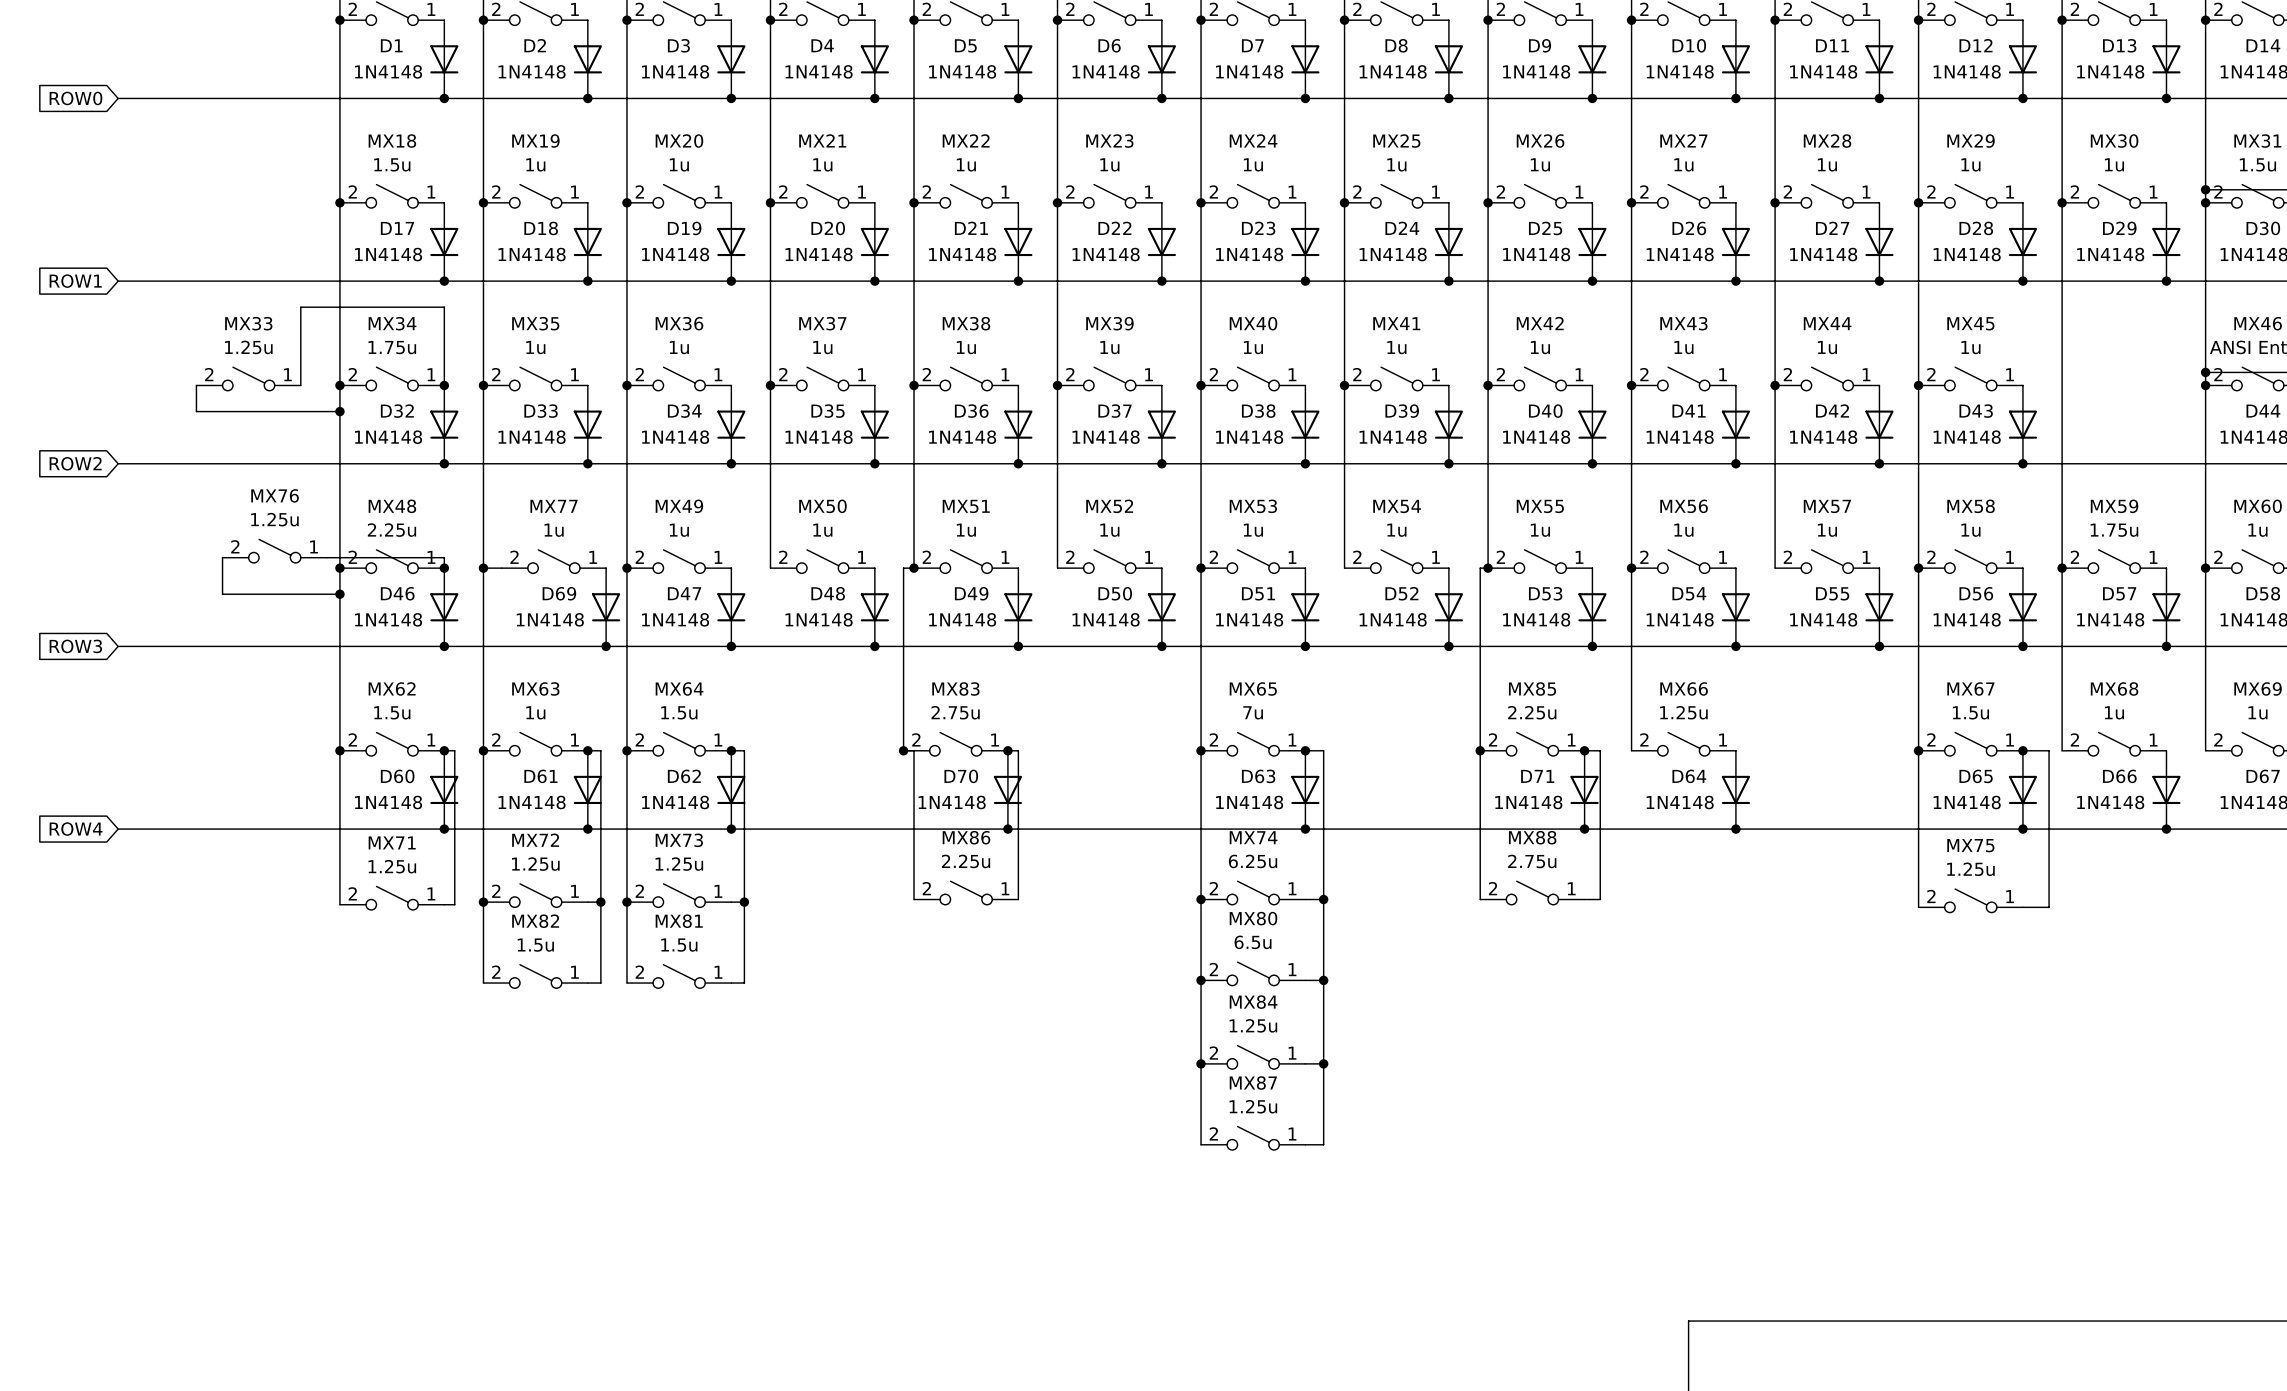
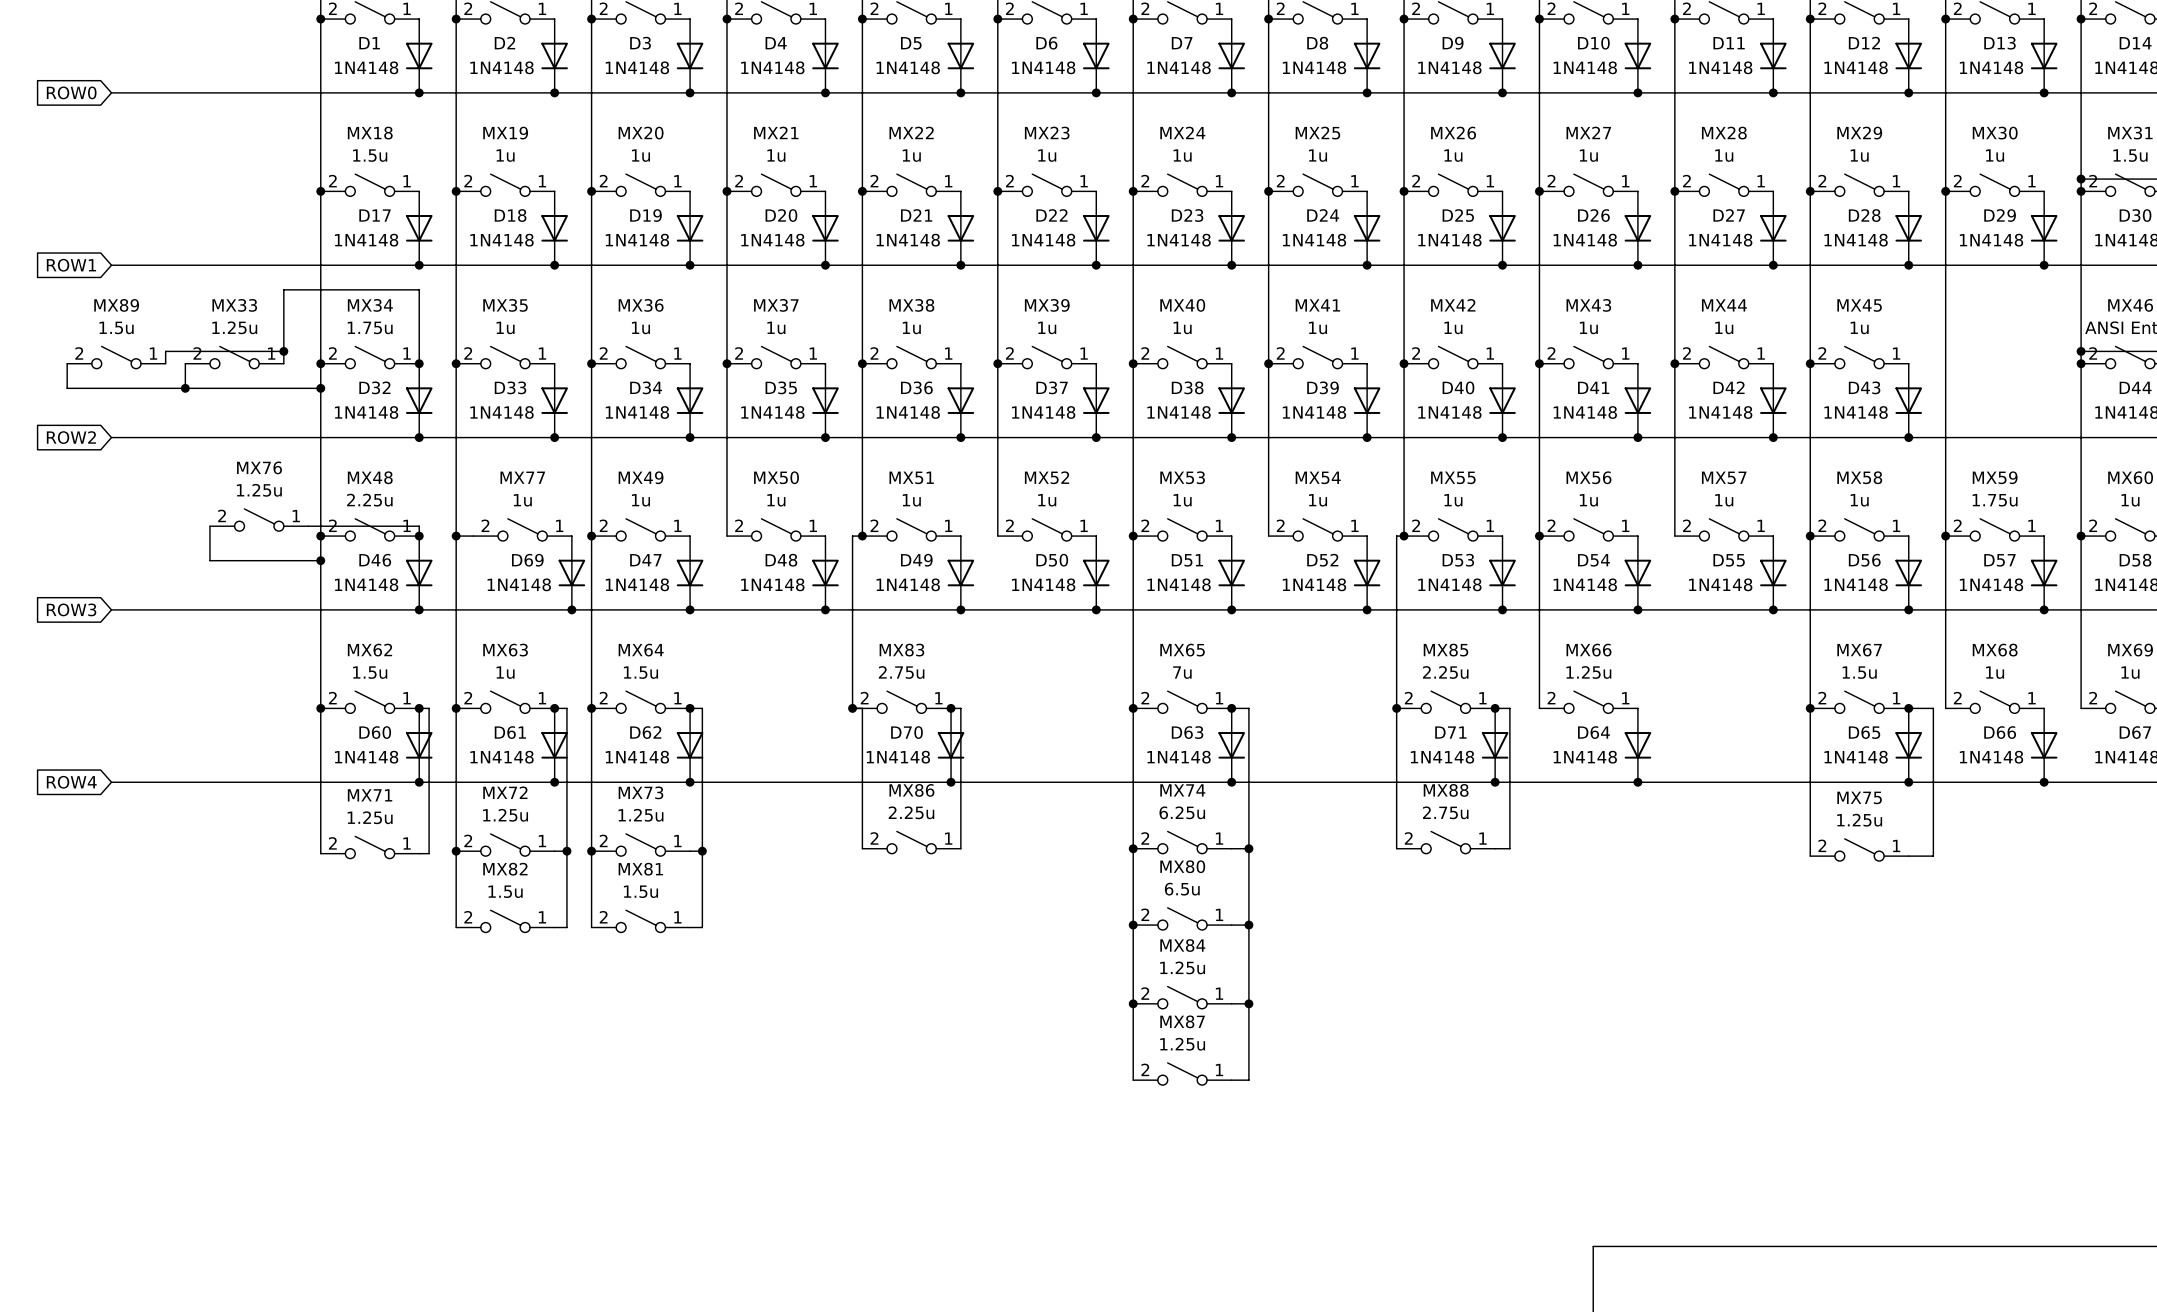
wire: none -> (283, 351) (165, 351) (165, 363)
junction: none -> (283, 351)
MX89: none -> 1.5u (116, 357)
wire: none -> (67, 363) (67, 388) (185, 388)
junction: none -> (185, 388)

